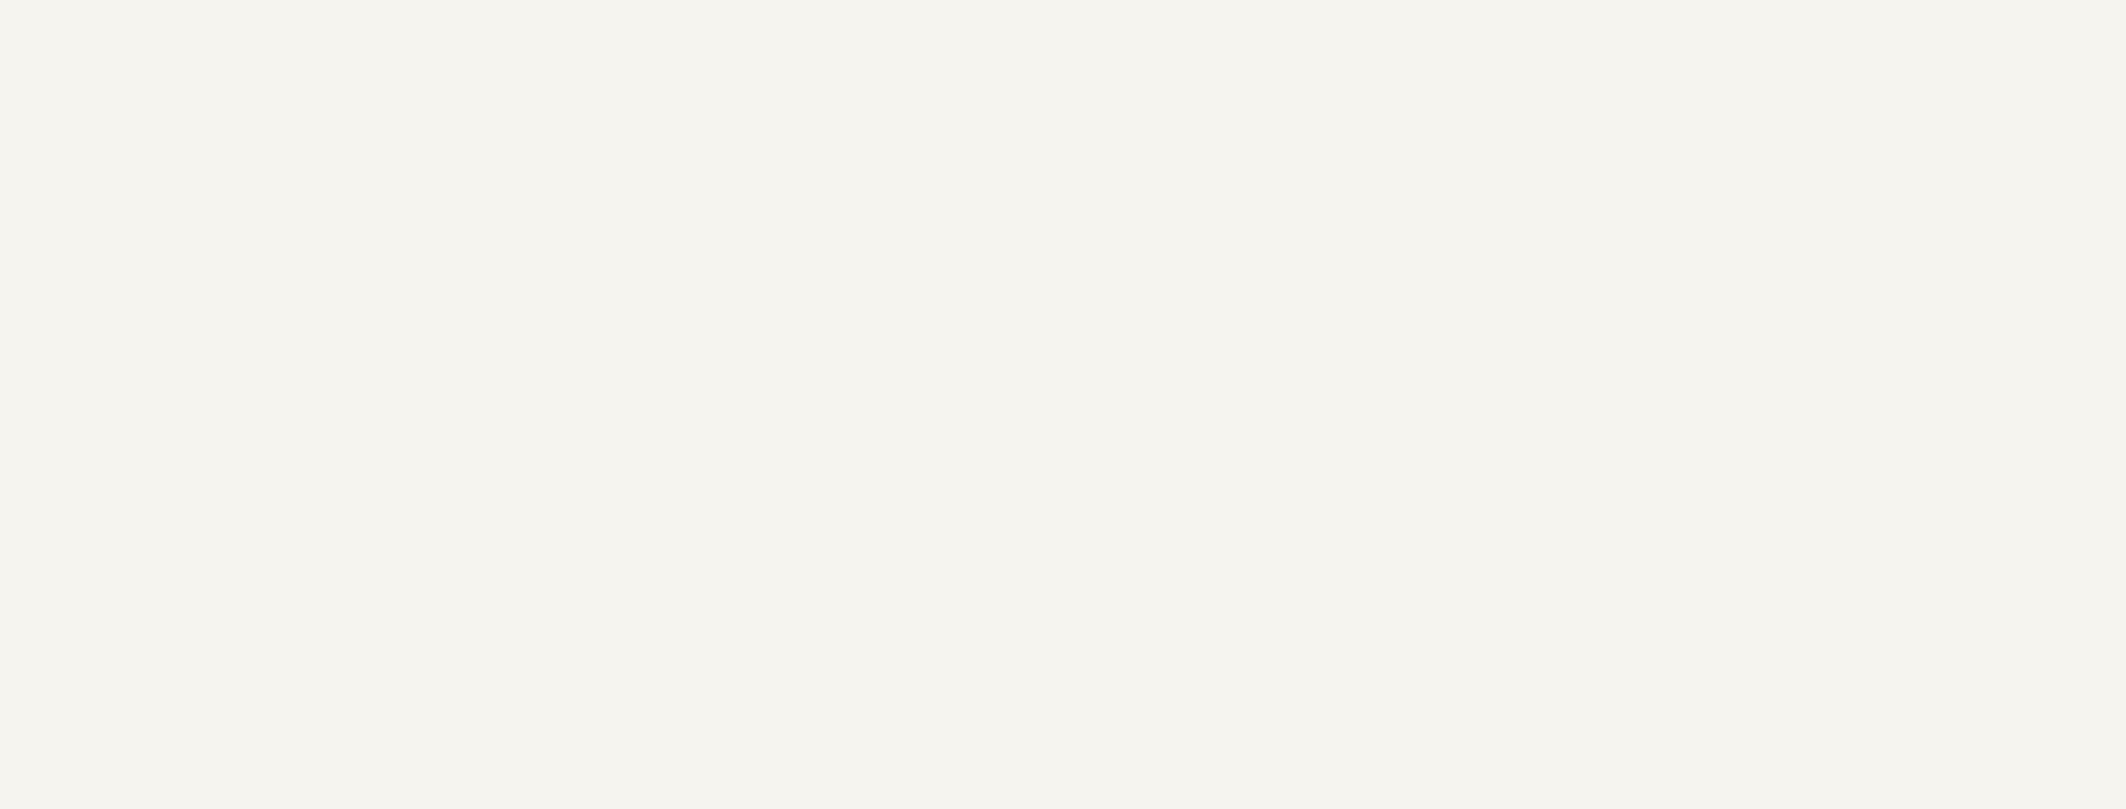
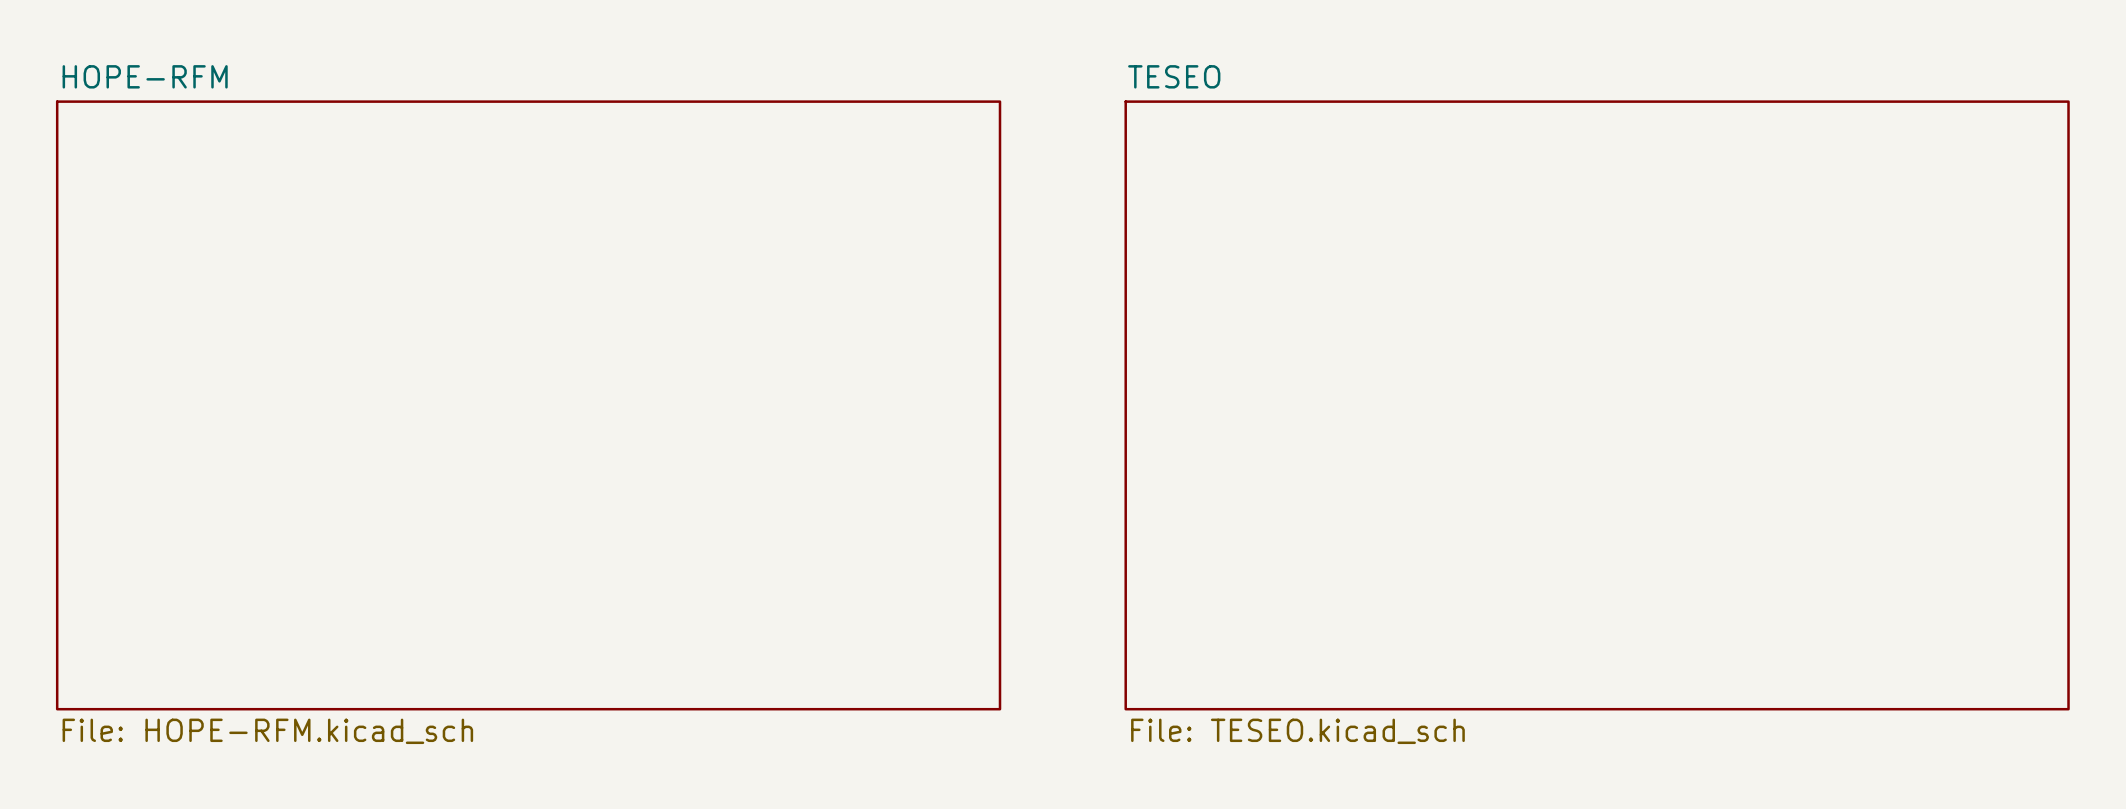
sheet HOPE-RFM: none -> File: HOPE-RFM.kicad_sch (528, 405)
sheet TESEO: none -> File: TESEO.kicad_sch (1597, 405)

